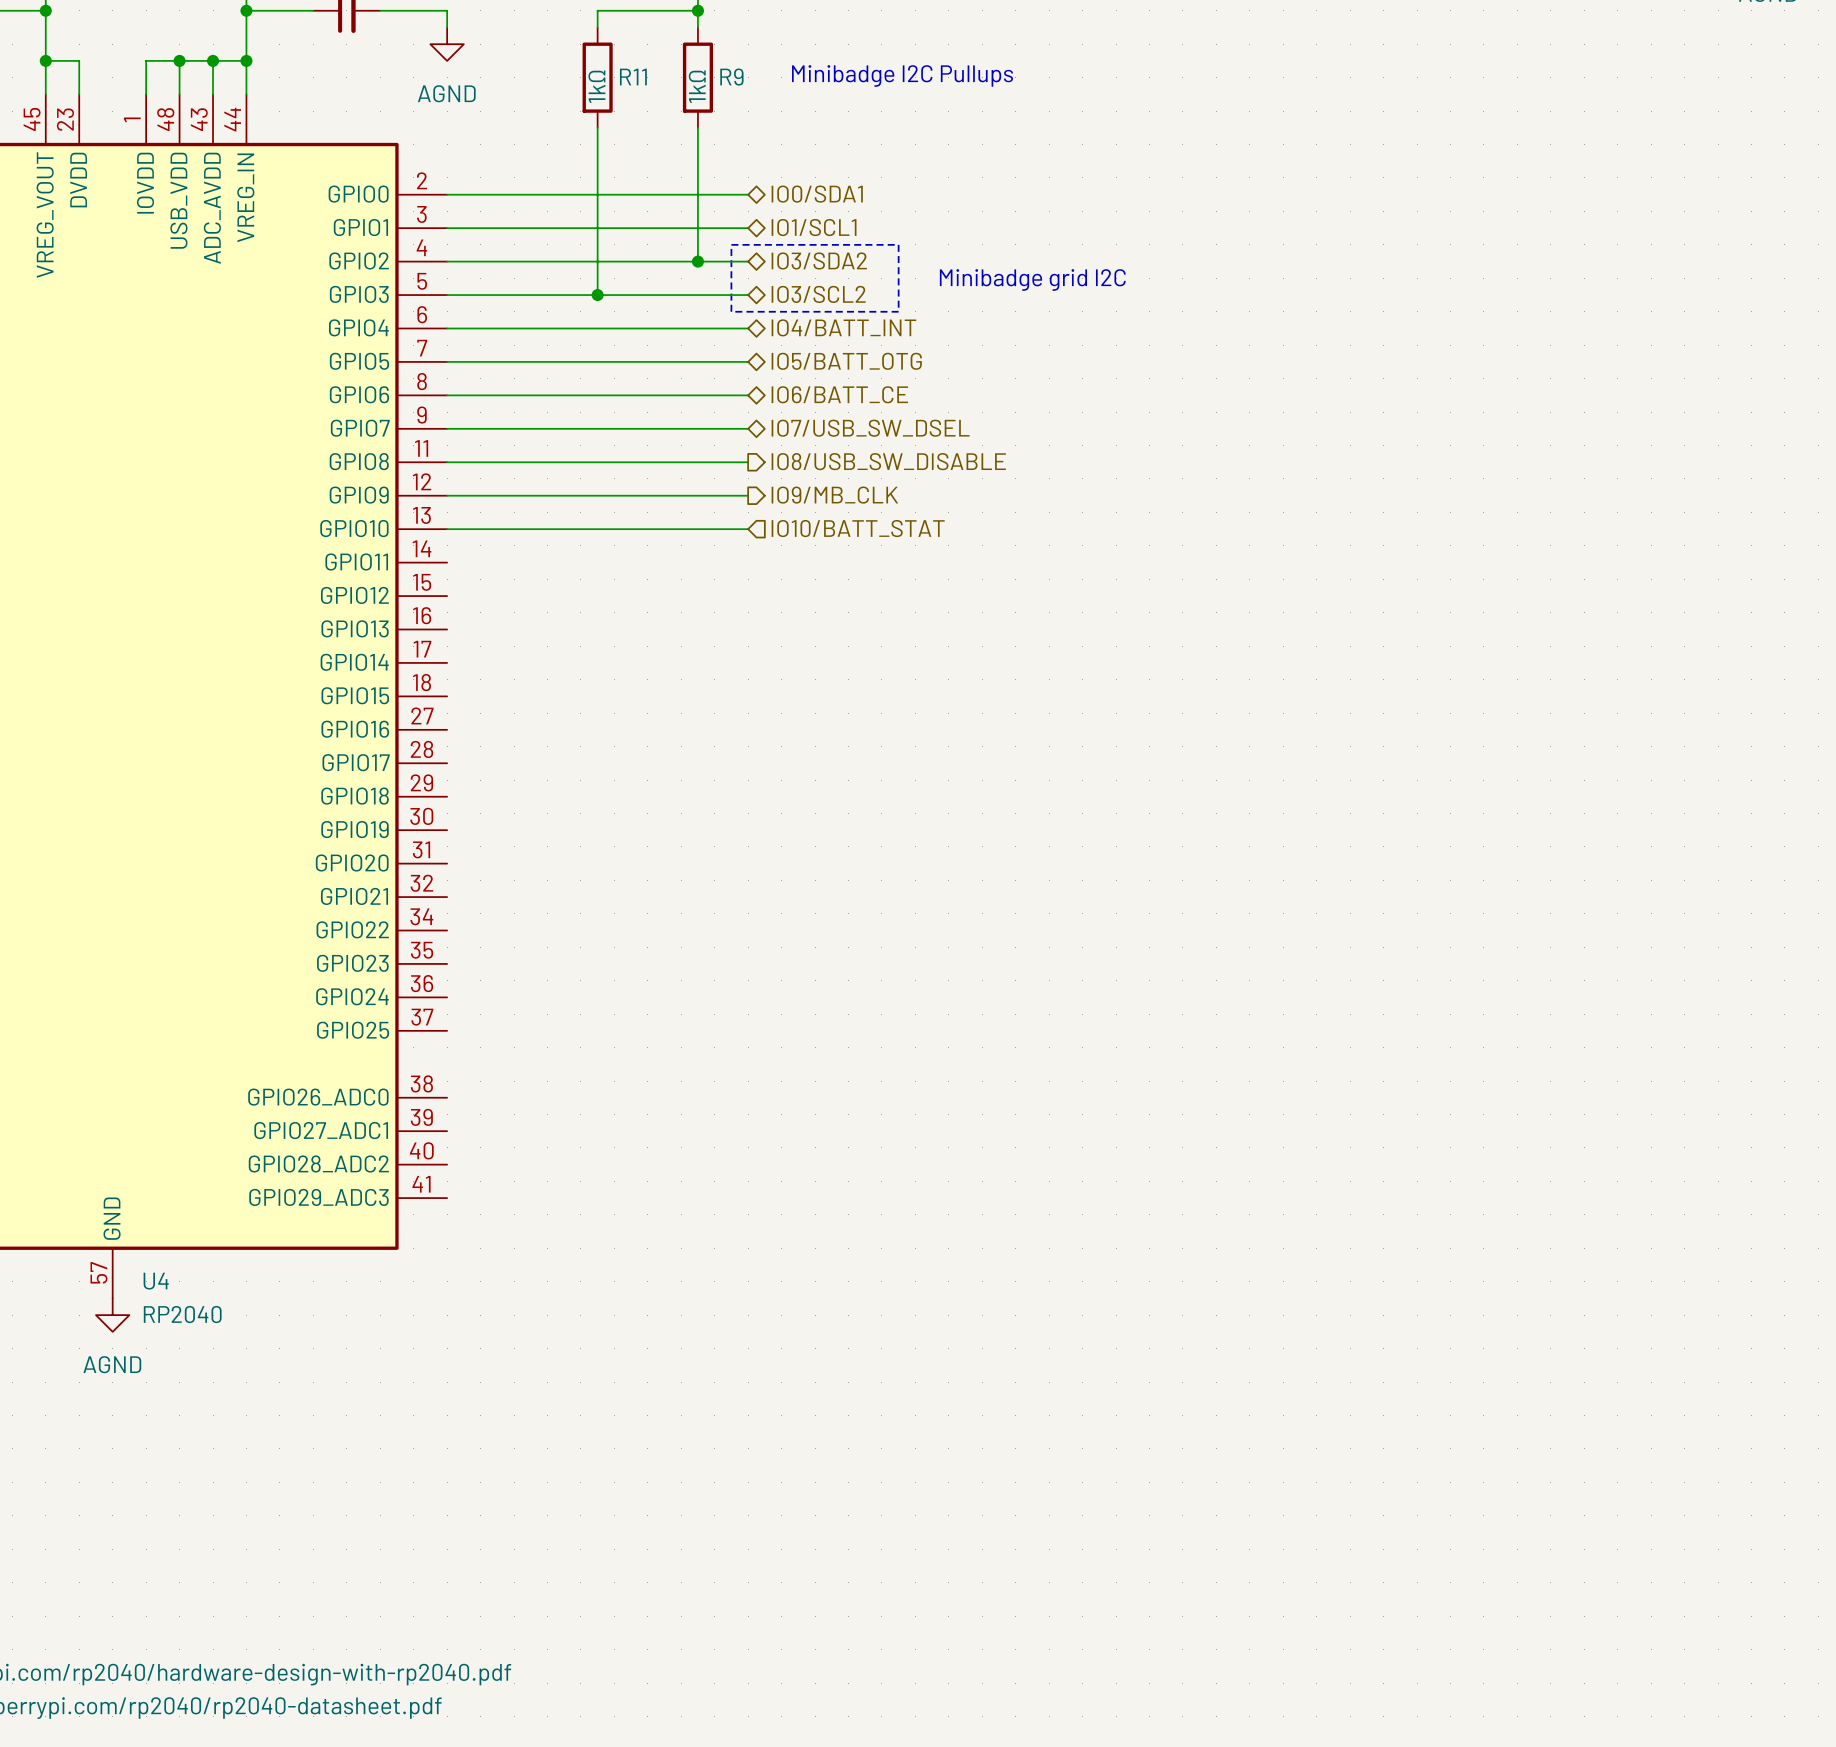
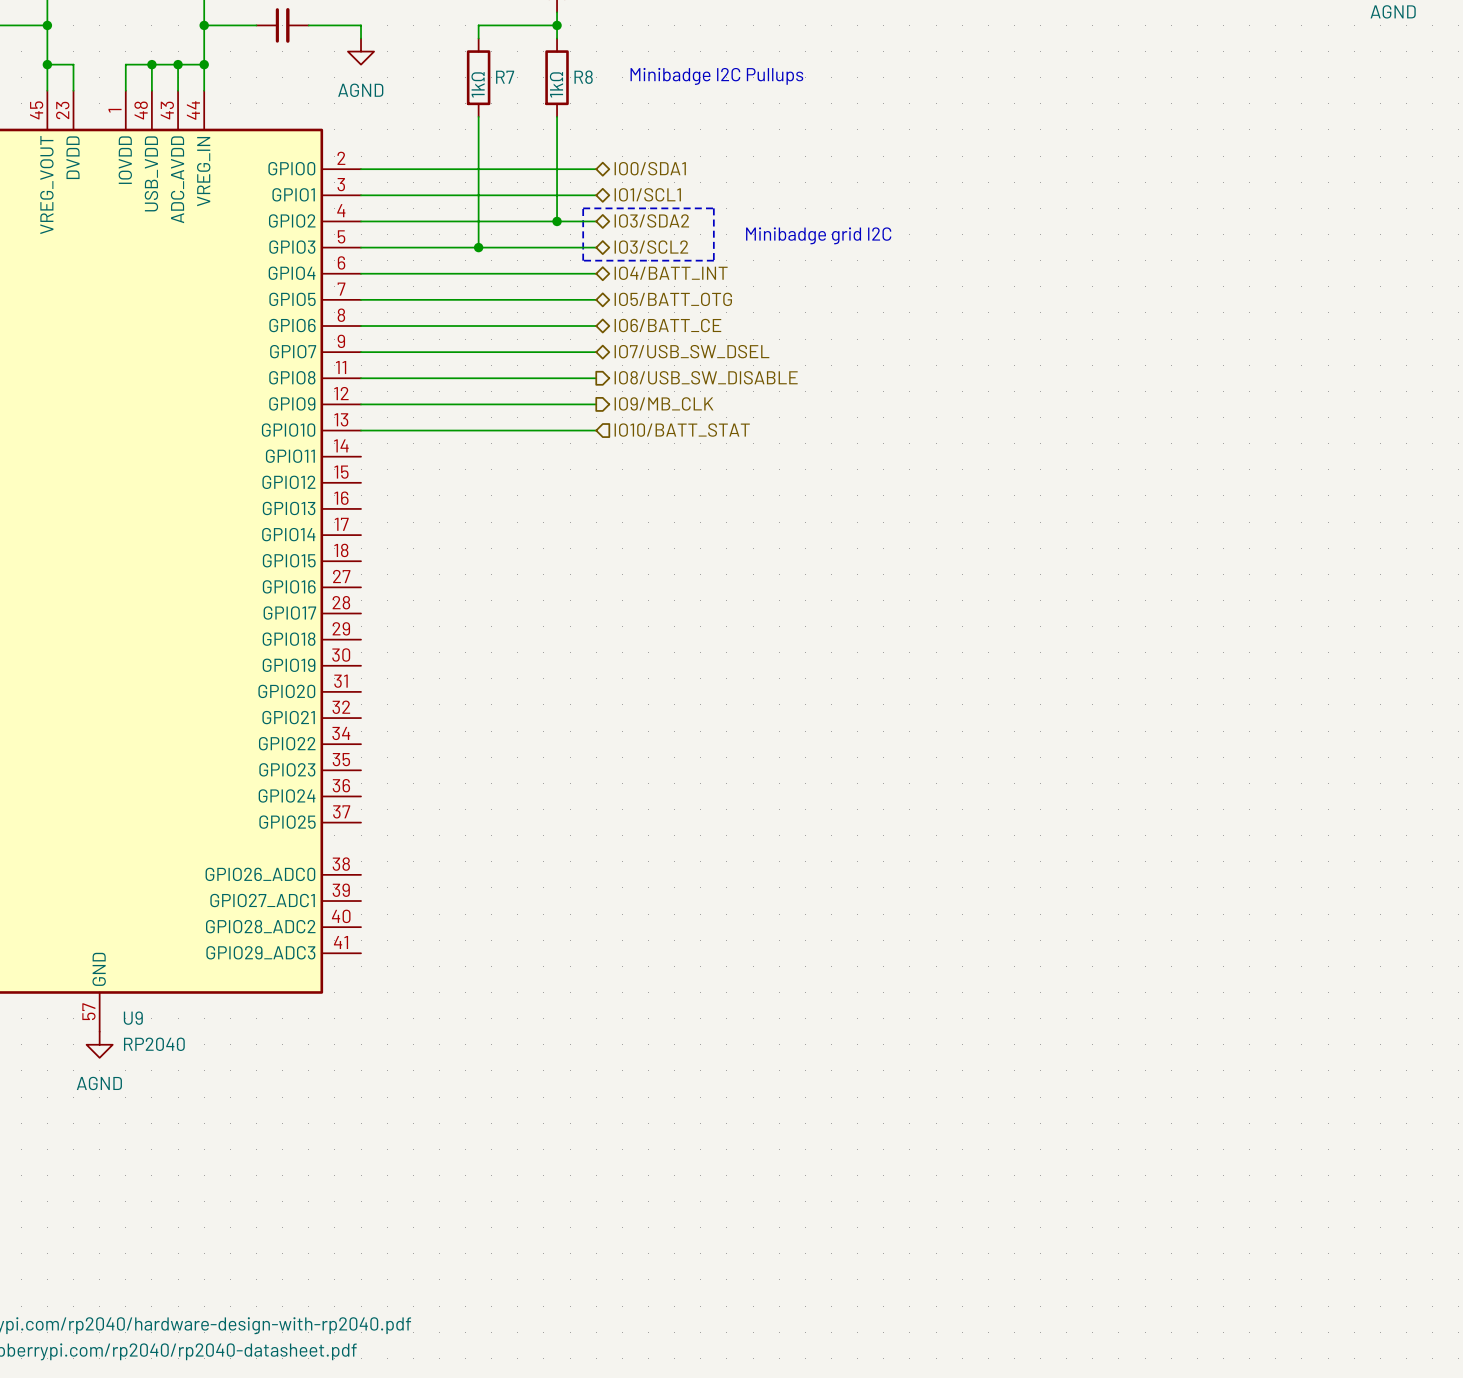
R11 name: R11 (633, 77) -> R7 (505, 77)
R9 name: R9 (731, 77) -> R8 (583, 77)
U4 name: U4 (156, 1281) -> U9 (133, 1018)

